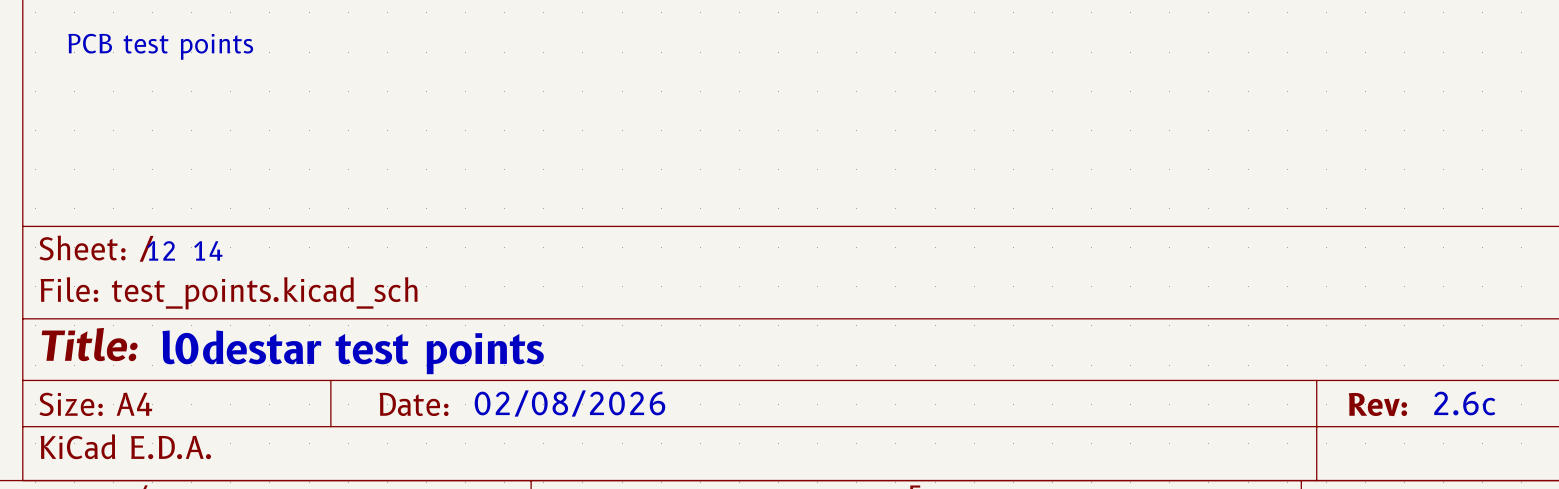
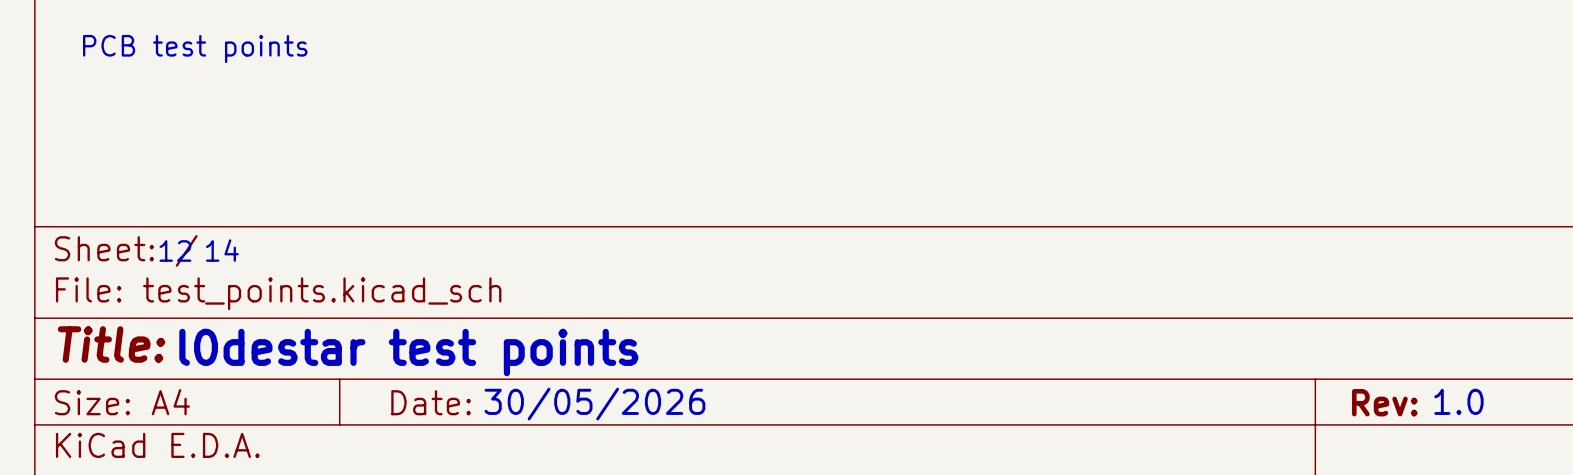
text: 02/08/2026 (569, 403) -> 30/05/2026 (594, 404)
text: 2.6c (1464, 403) -> 1.0 (1458, 401)

